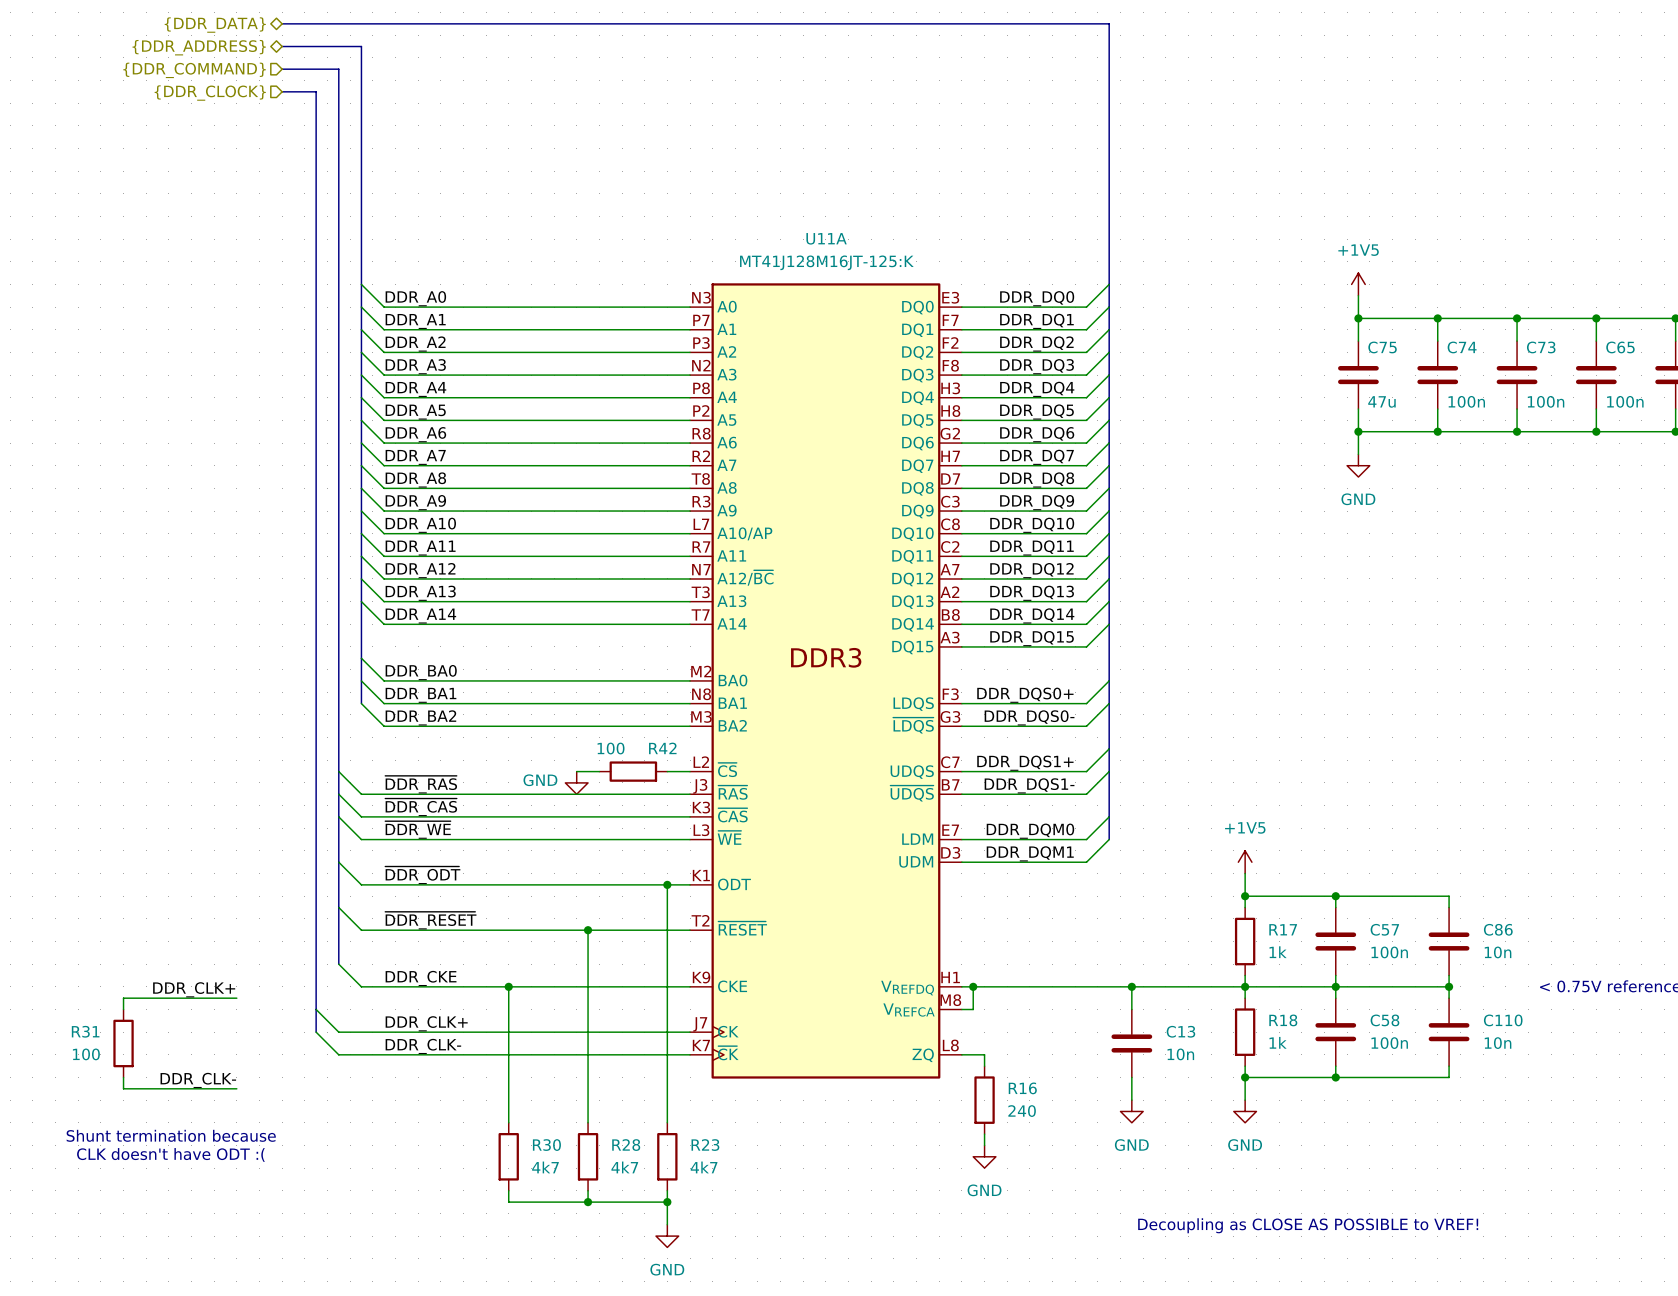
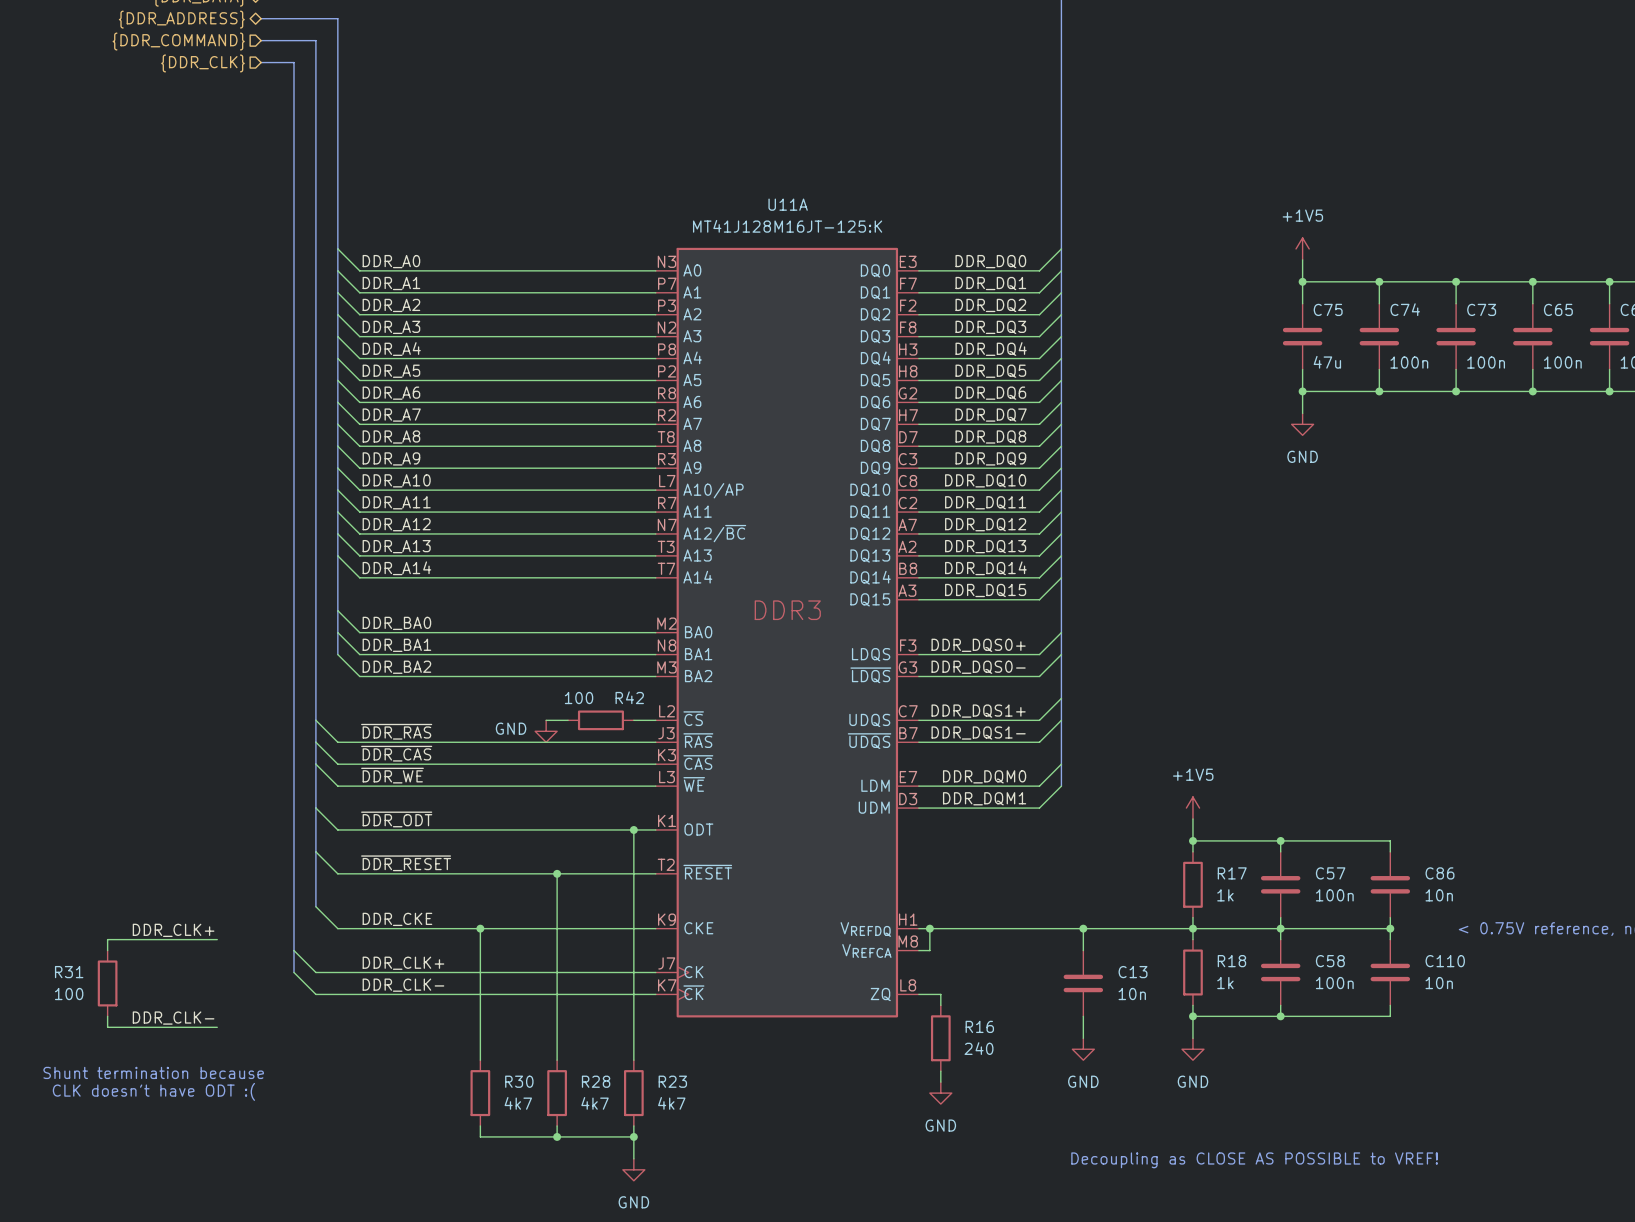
hierarchical label: {DDR_CLOCK} (210, 93) -> {DDR_CLK} (202, 63)

